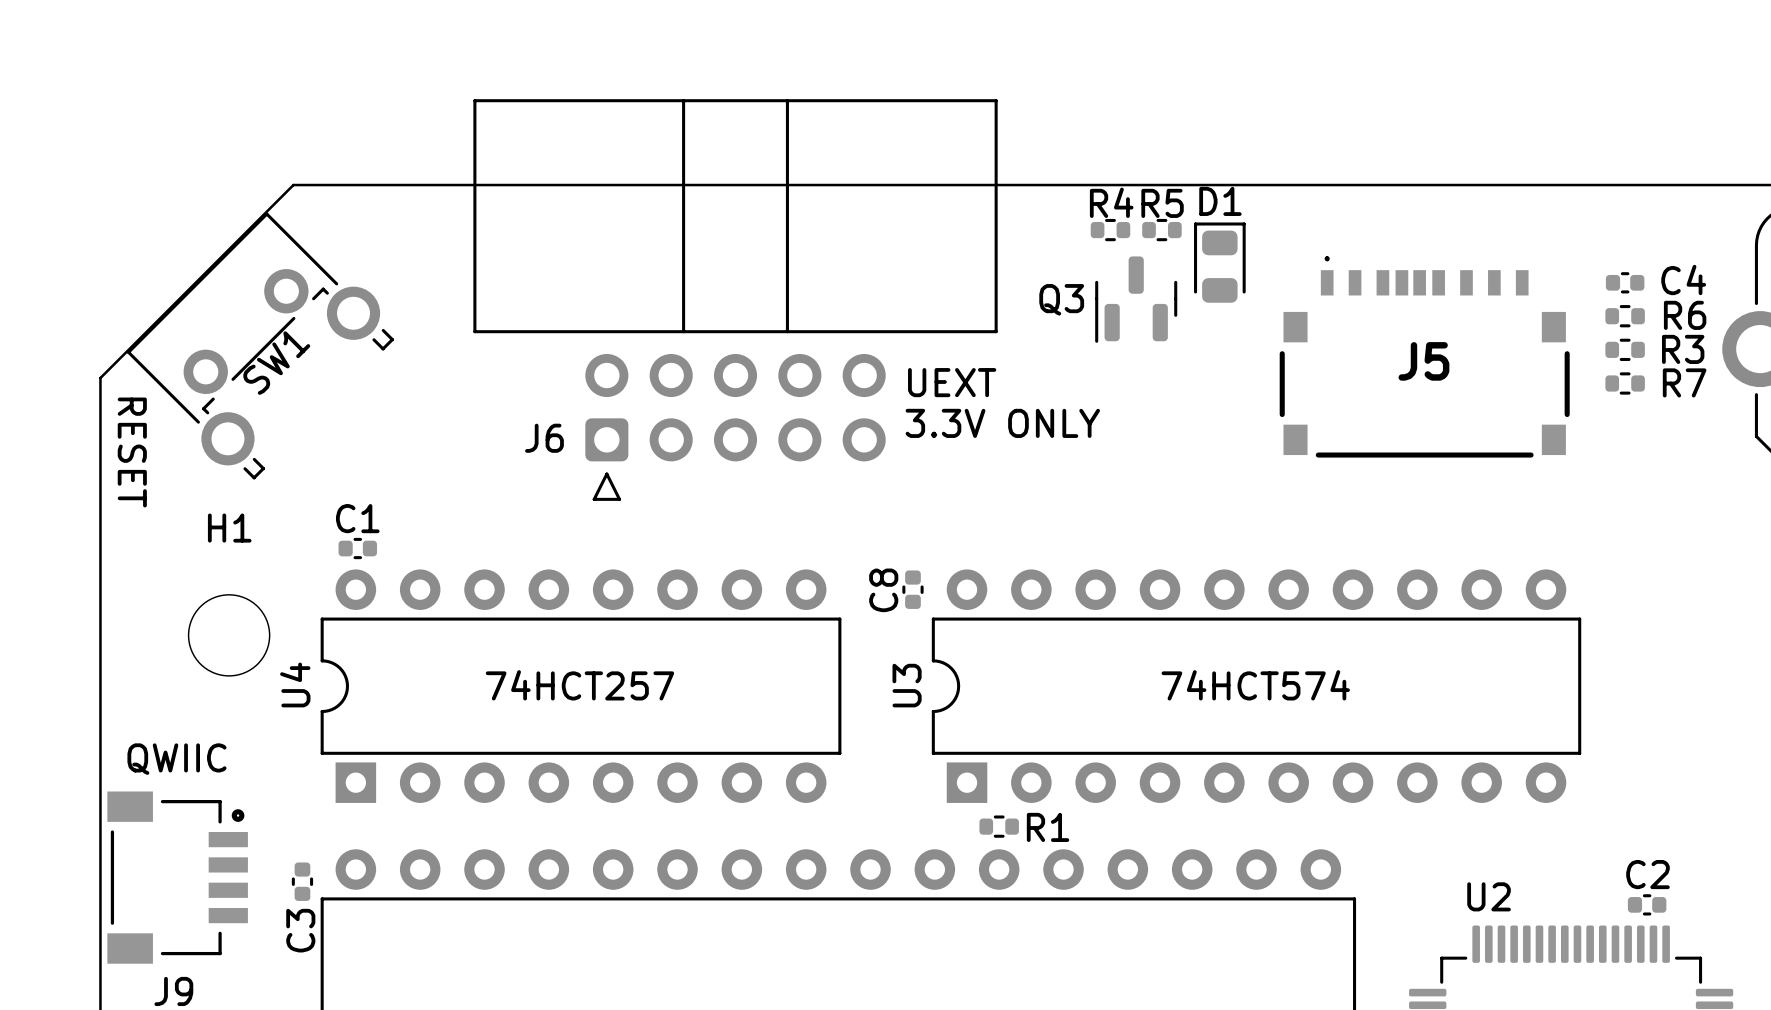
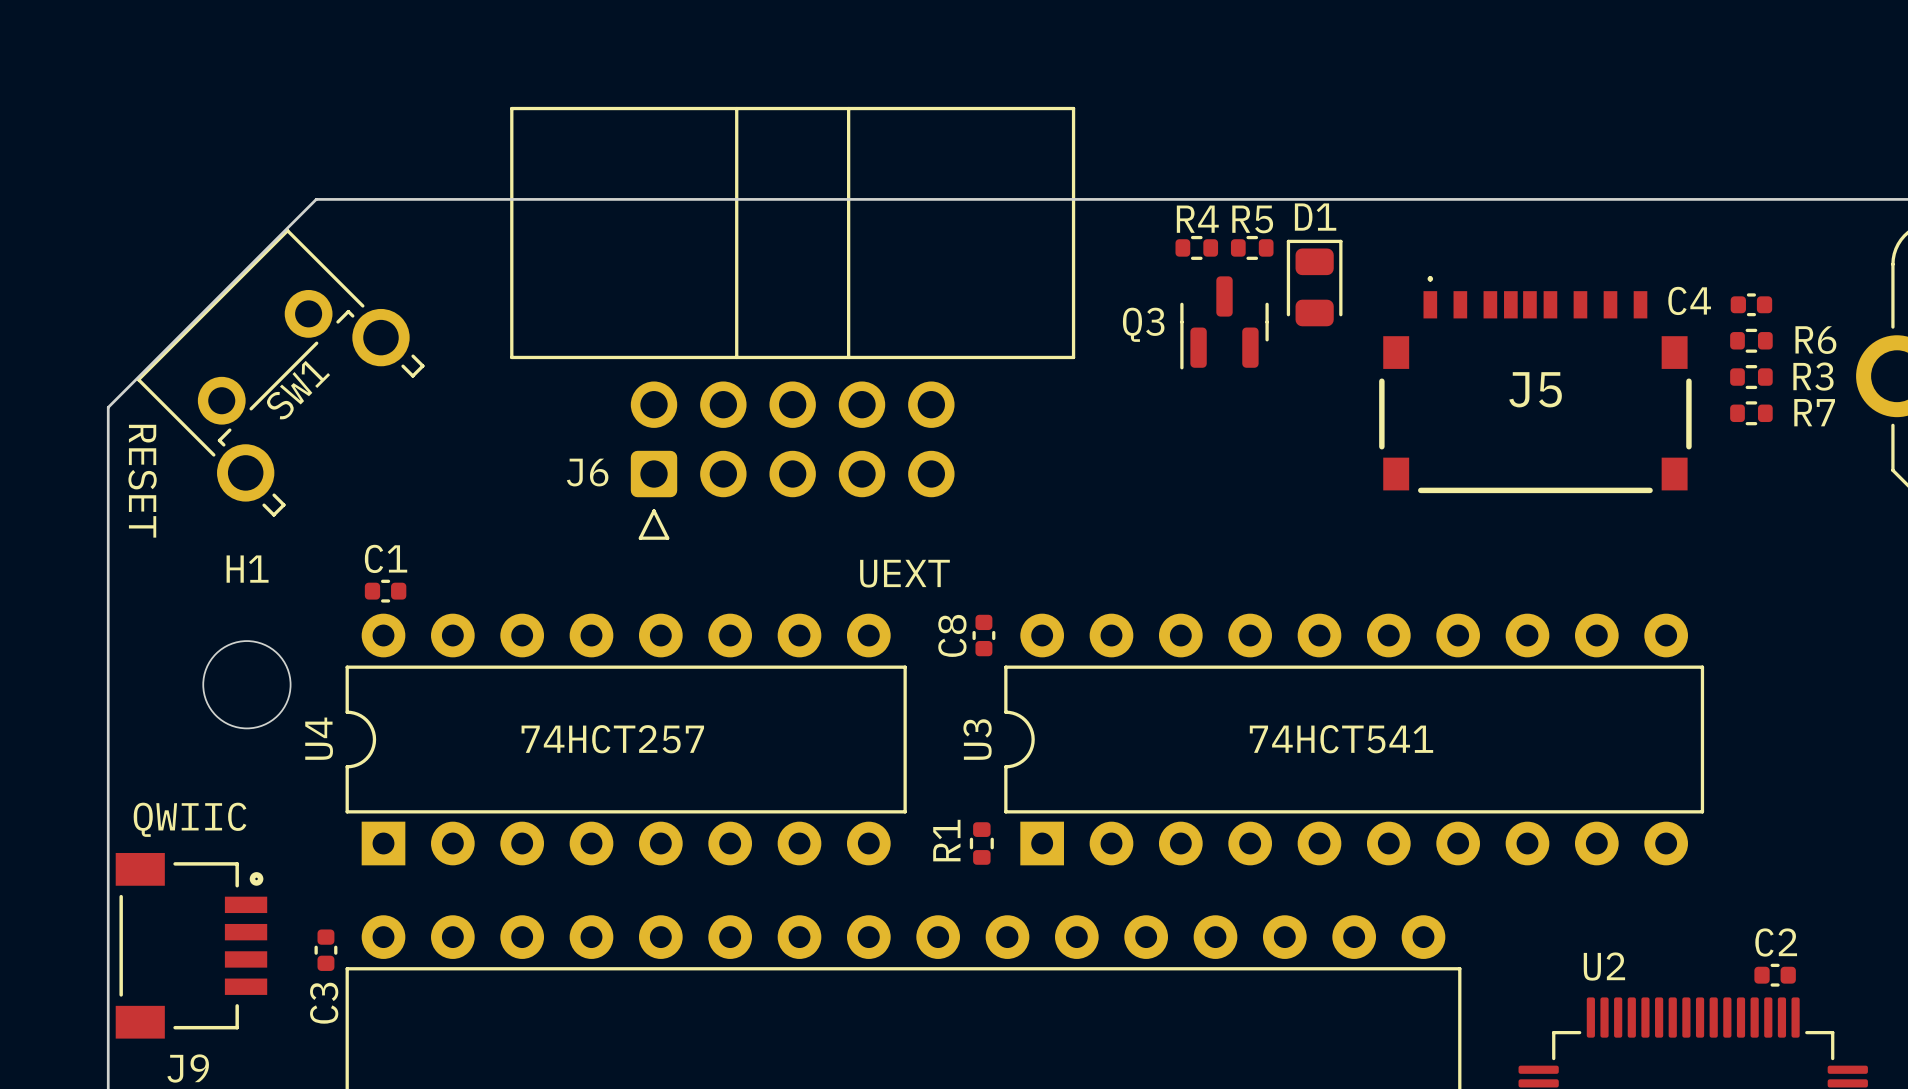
C4 name position: C4 (1683, 279) -> C4 (1689, 300)
text position: UEXT (952, 382) -> UEXT (904, 573)
text: 3.3V ONLY (1002, 423) -> none
text: 74HCT574 (1255, 685) -> 74HCT541 (1341, 739)
R1 rotation: 0° (999, 826) -> 90° clockwise (981, 843)
R1 position: (999, 826) -> (981, 843)
R1 name position: R1 (1048, 827) -> R1 (946, 840)

